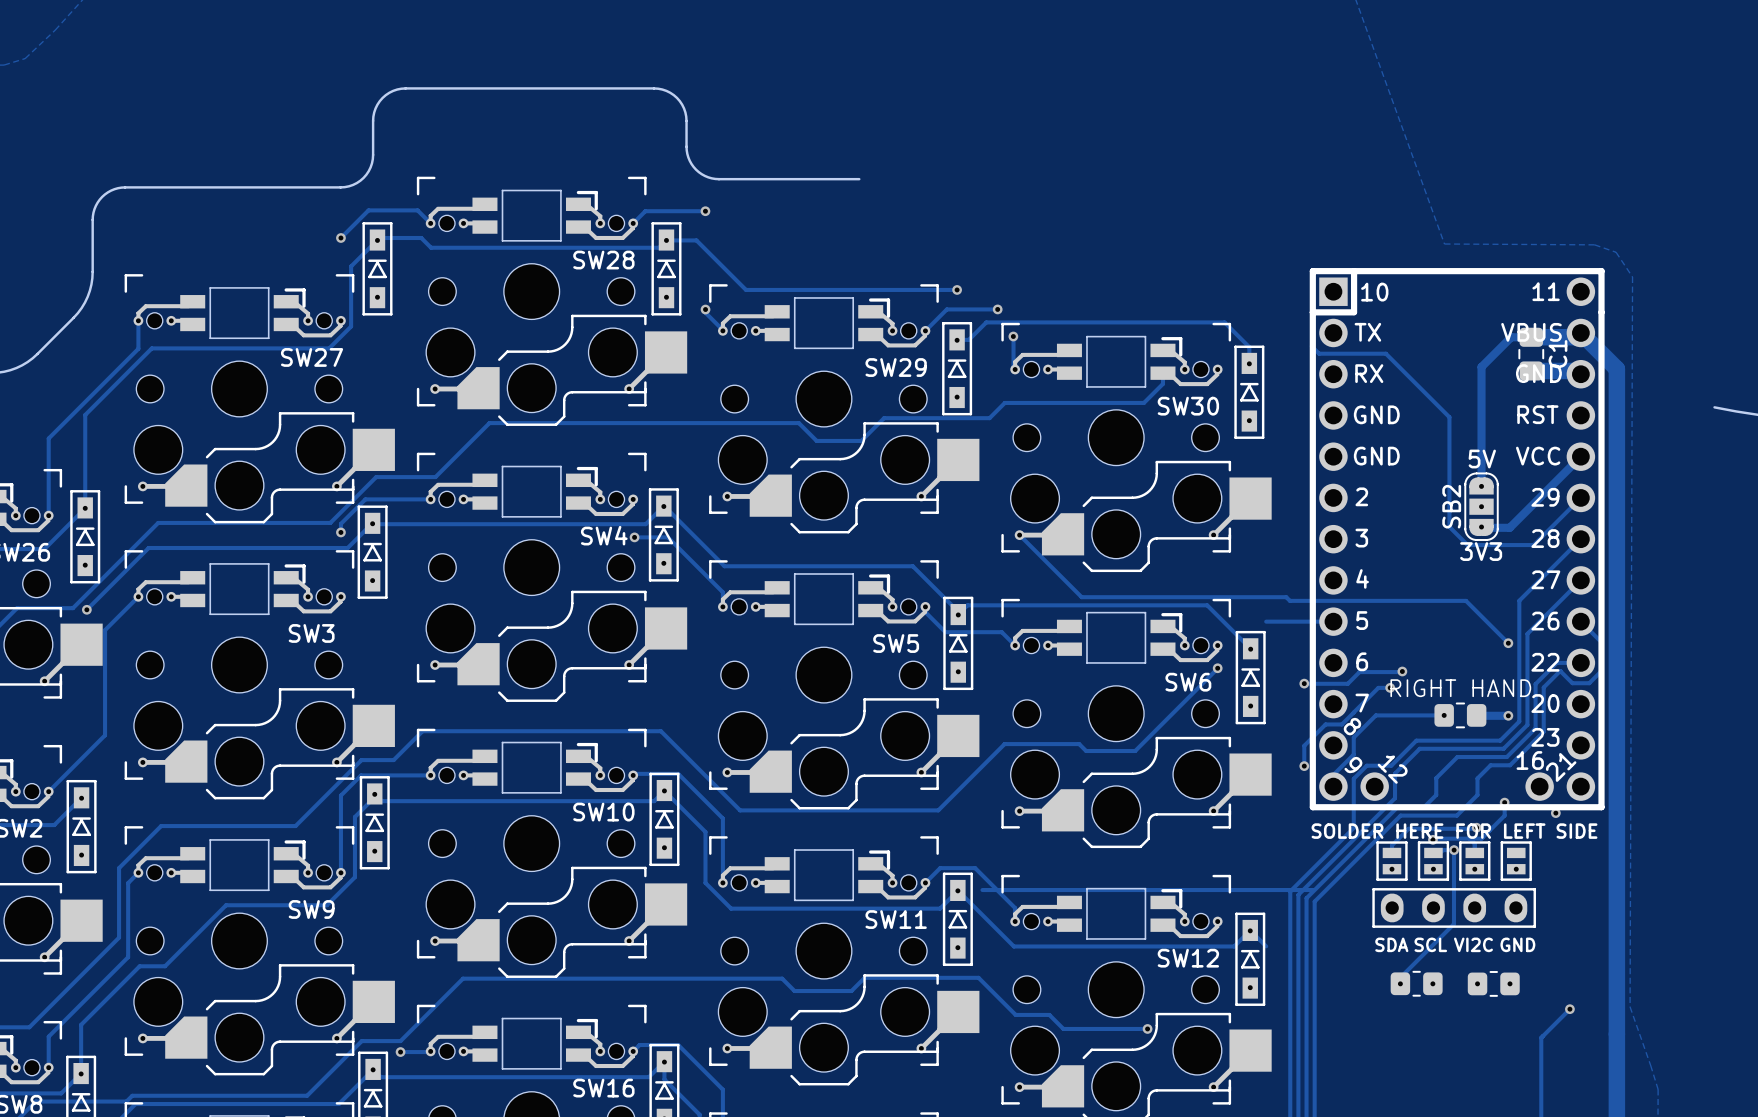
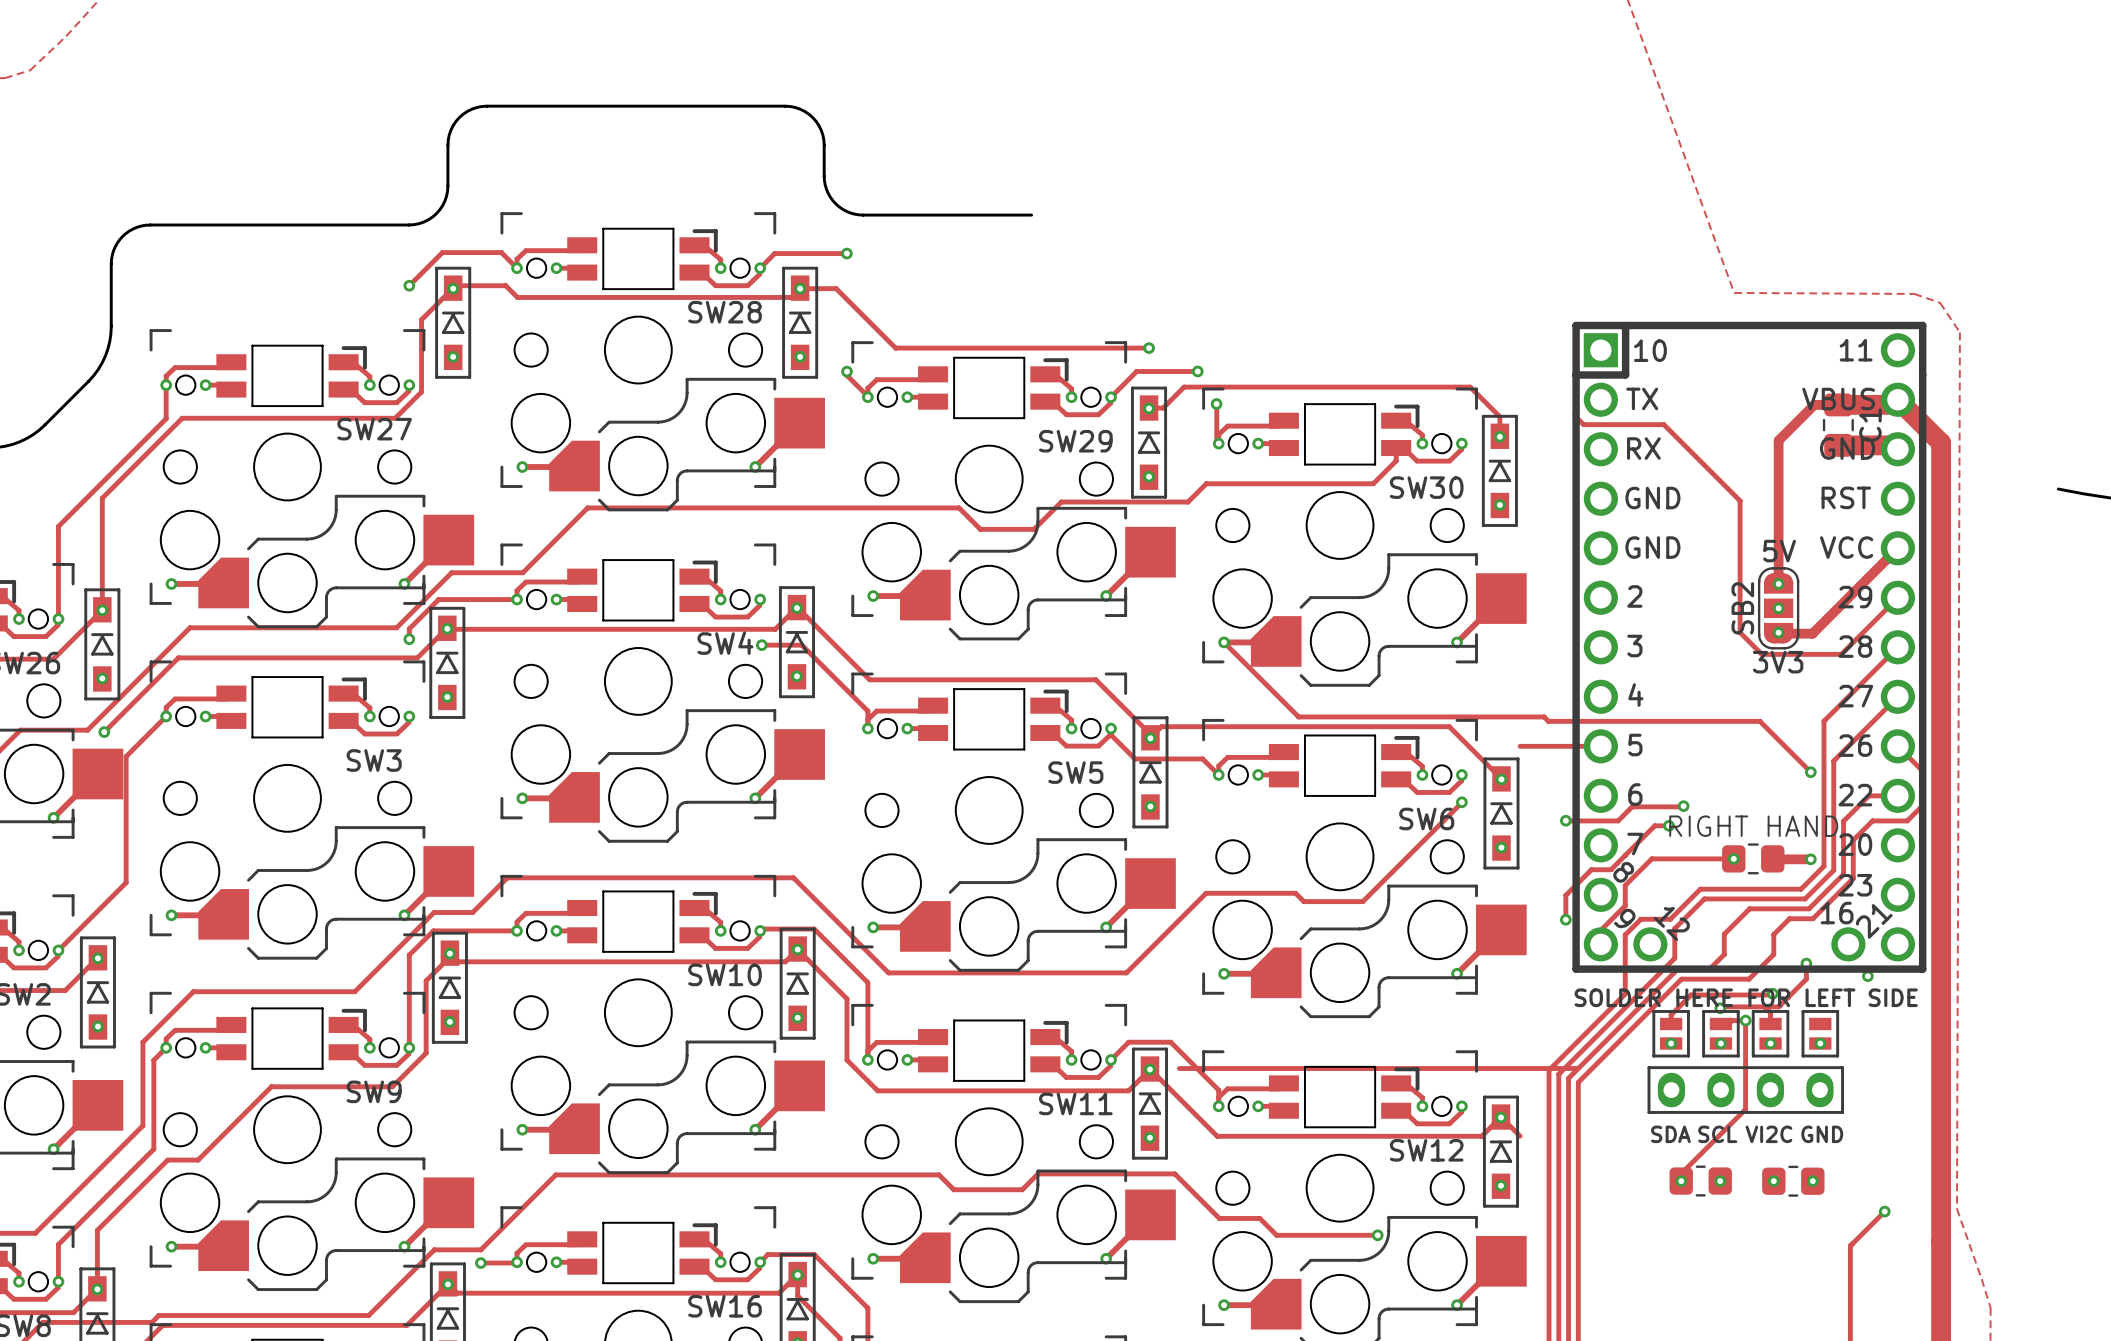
track: (1560, 671) (1543, 687) (1543, 699) -> (1908, 820) (1872, 820) (1853, 840)
track: (1560, 671) (1572, 683) (1589, 683) -> none

